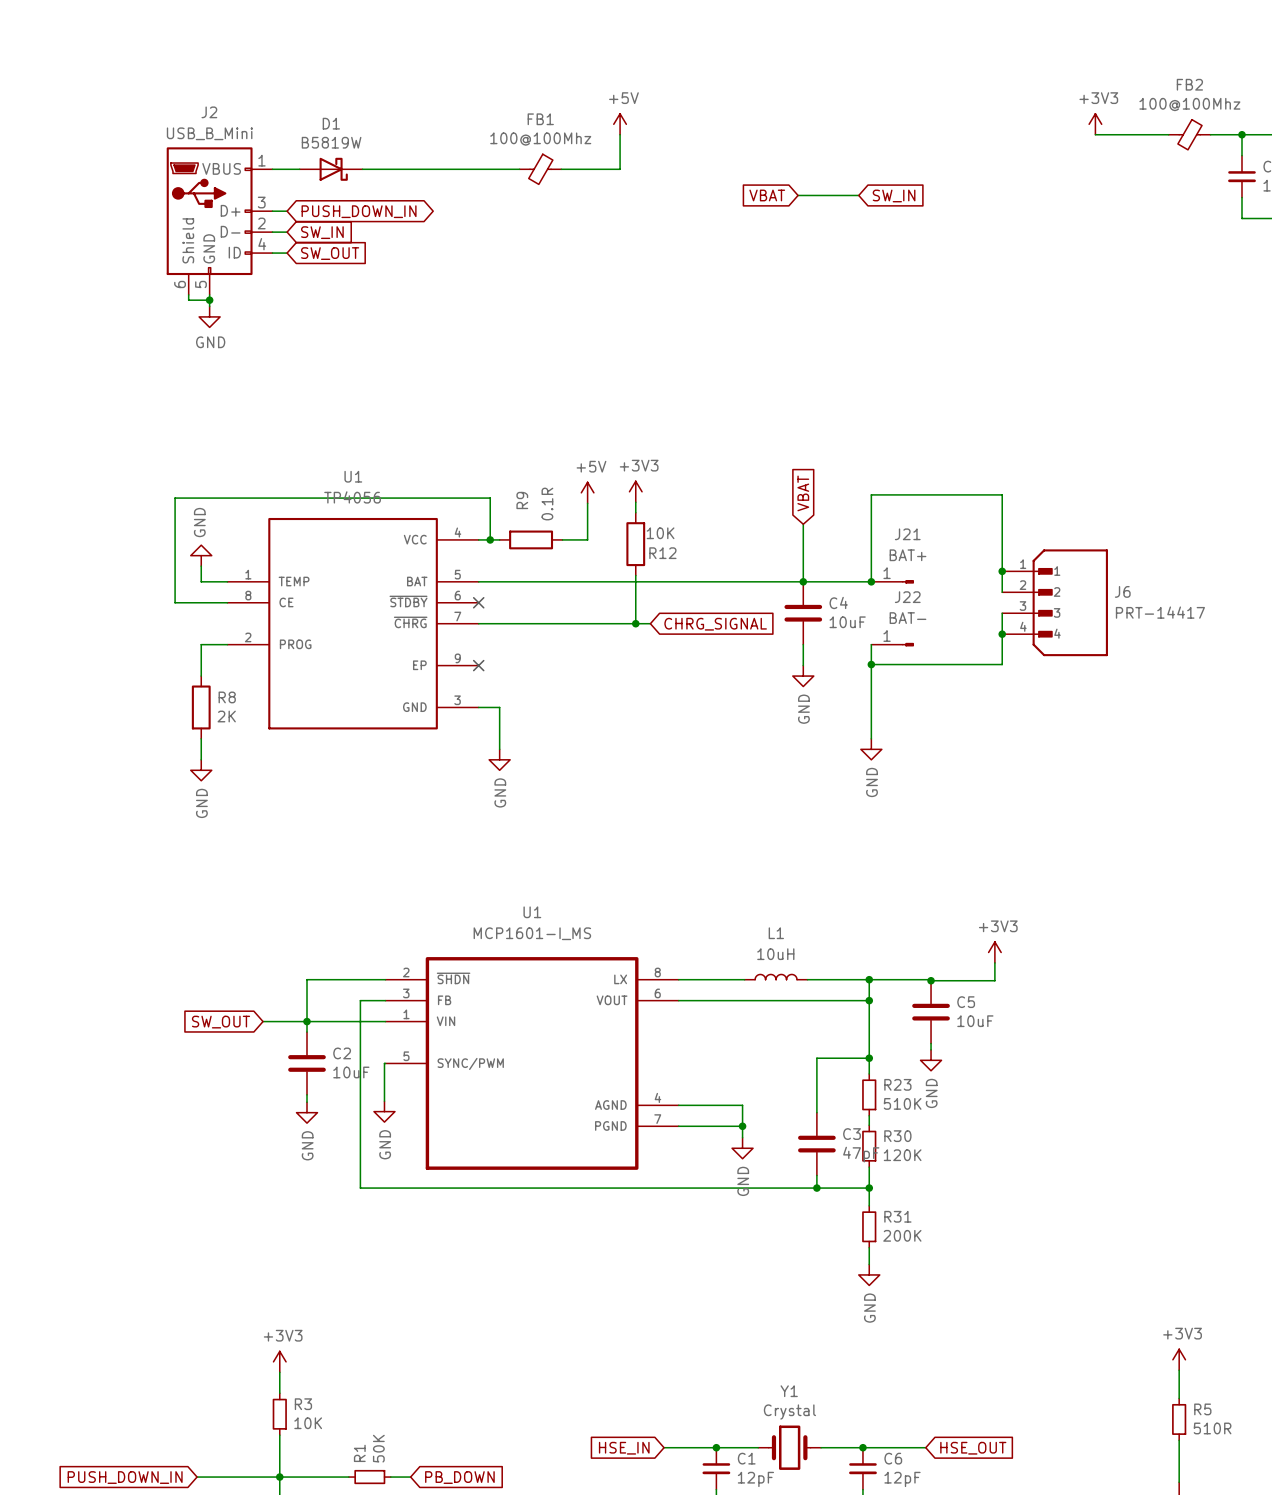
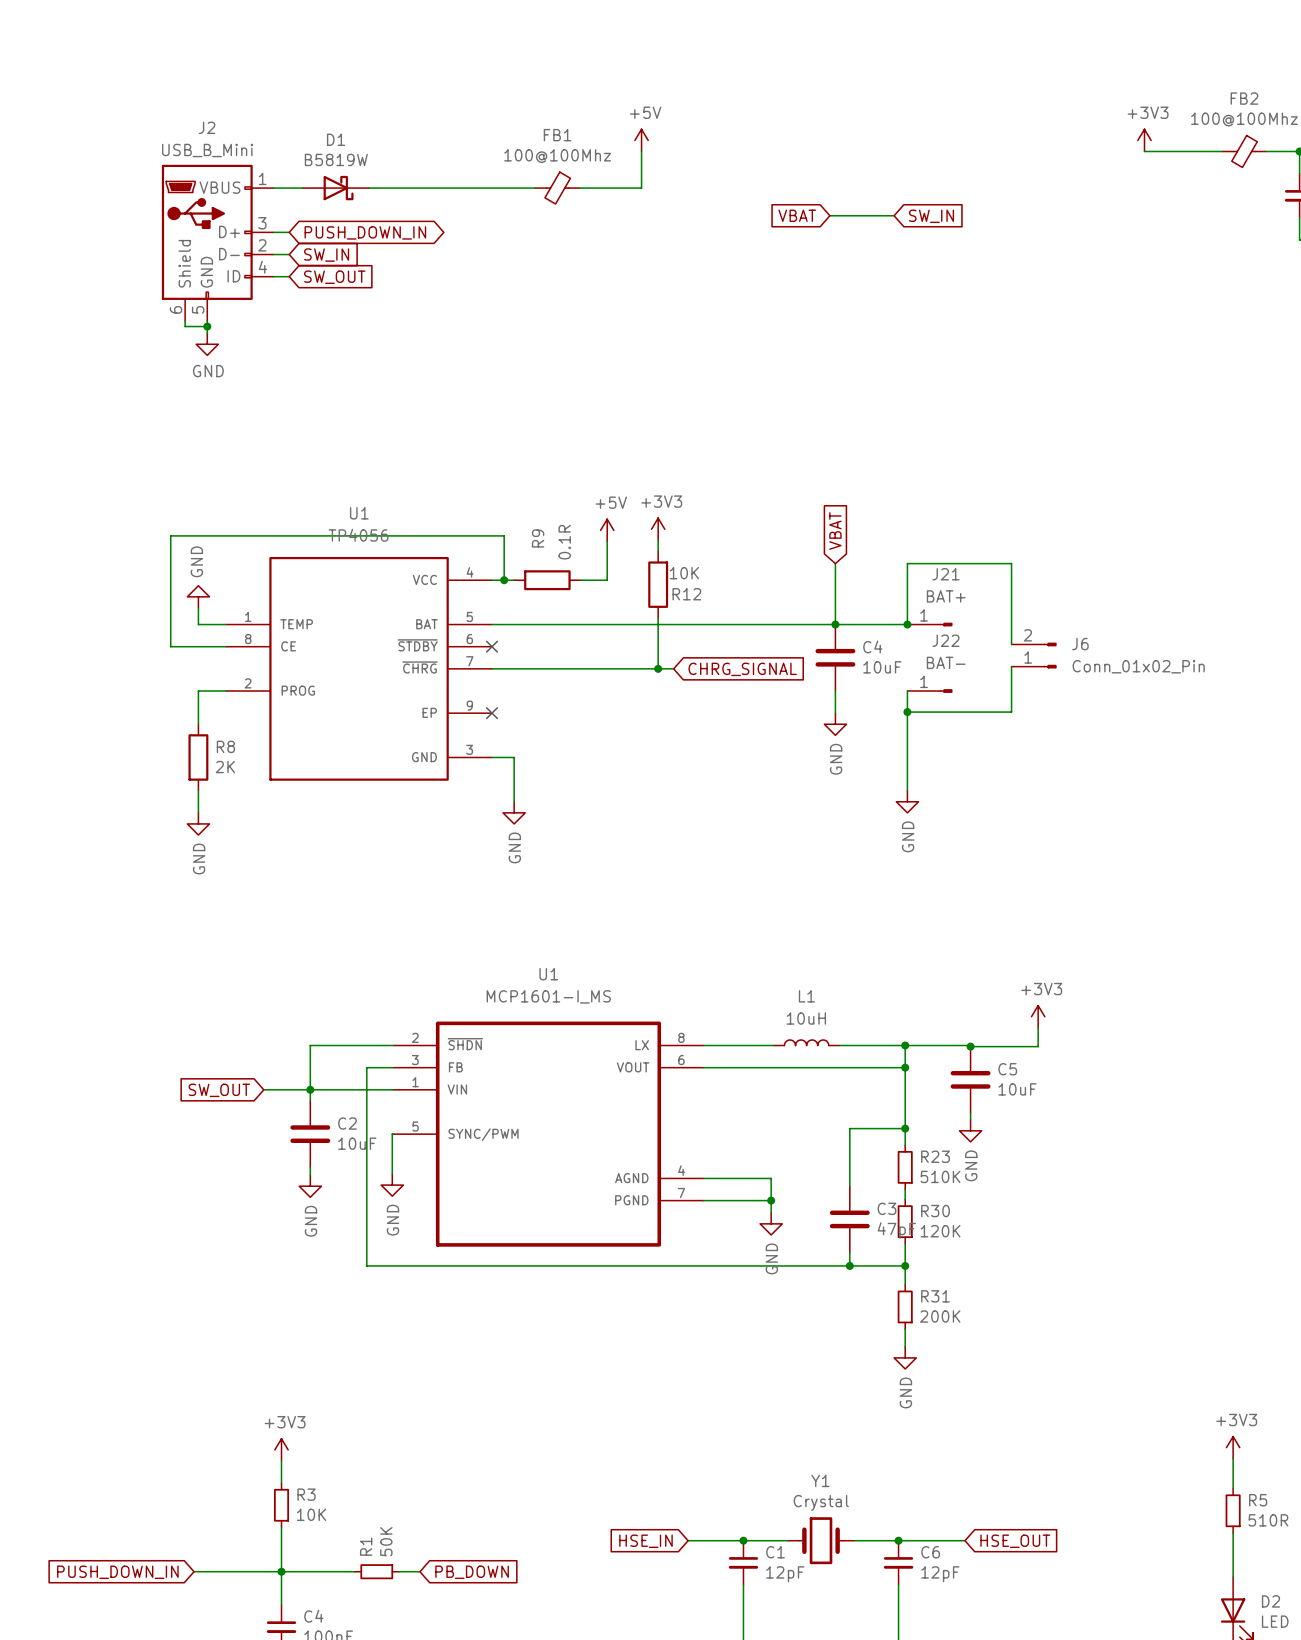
wire: (871, 524) (871, 494) (1002, 494) (1002, 592) -> (907, 563) (1011, 563) (1011, 644)
J6 symbol: [1002, 549, 1108, 657] -> [1011, 642, 1057, 669]
junction: (1002, 571) -> none
J6 name position: J6 (1122, 591) -> J6 (1080, 644)
J6 value: PRT-14417 (1160, 612) -> Conn_01x02_Pin (1138, 666)
wire: (1002, 613) (1002, 664) (969, 664) -> (1011, 666) (1011, 712)
junction: (1002, 634) -> none

